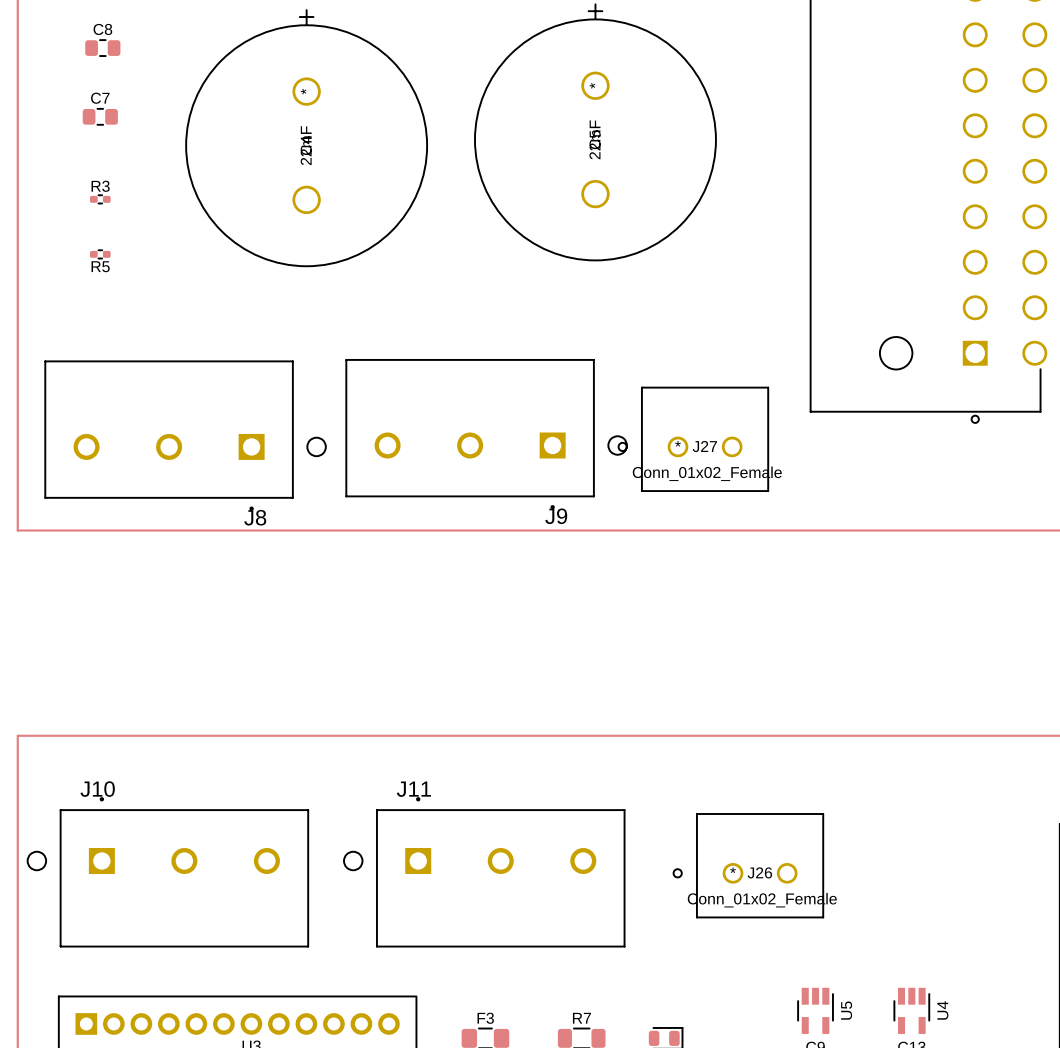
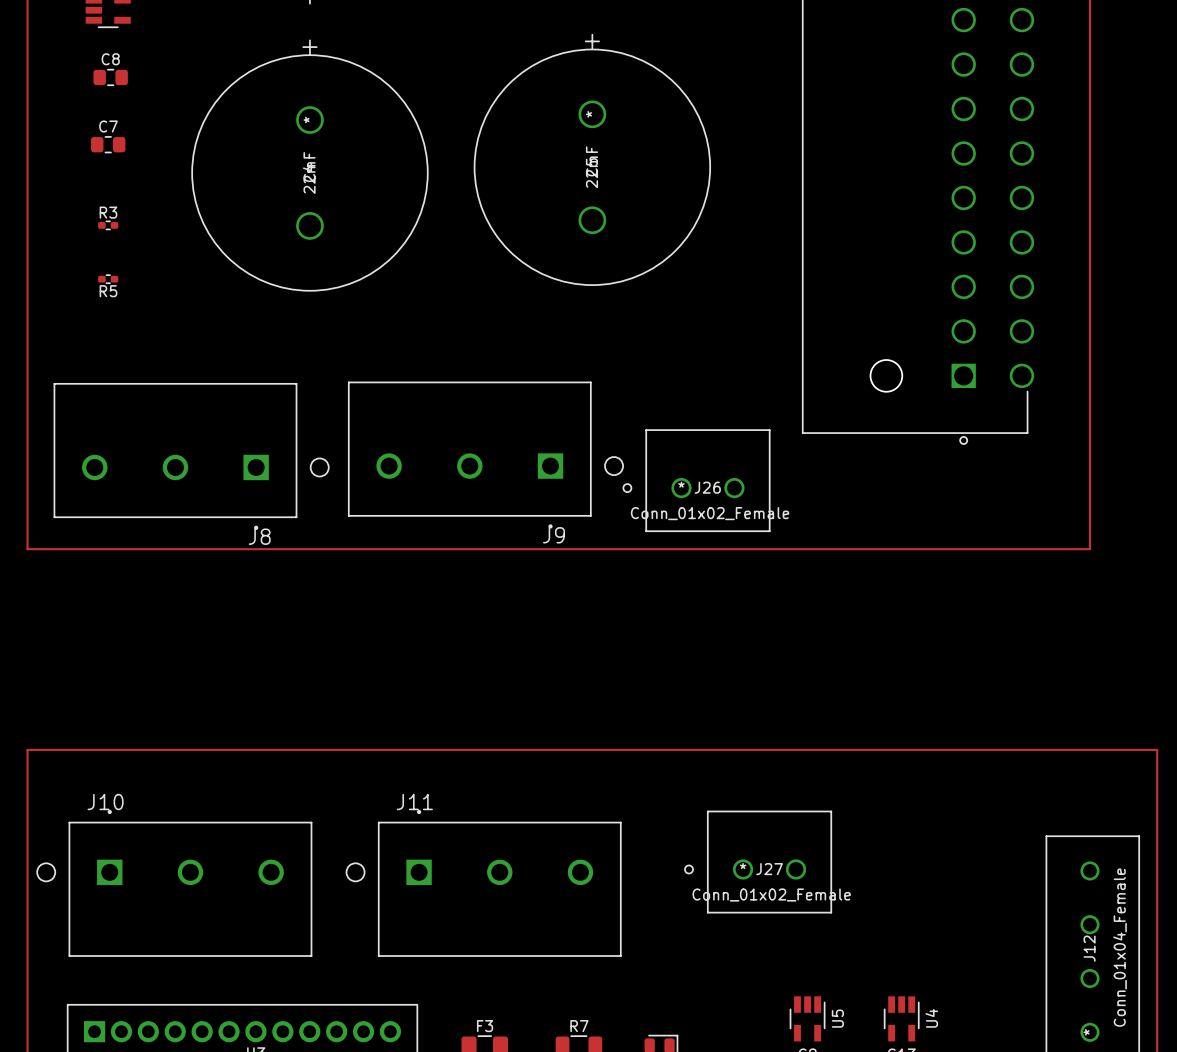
J27 position: (693, 439) -> (758, 862)
J26 position: (748, 865) -> (696, 480)

